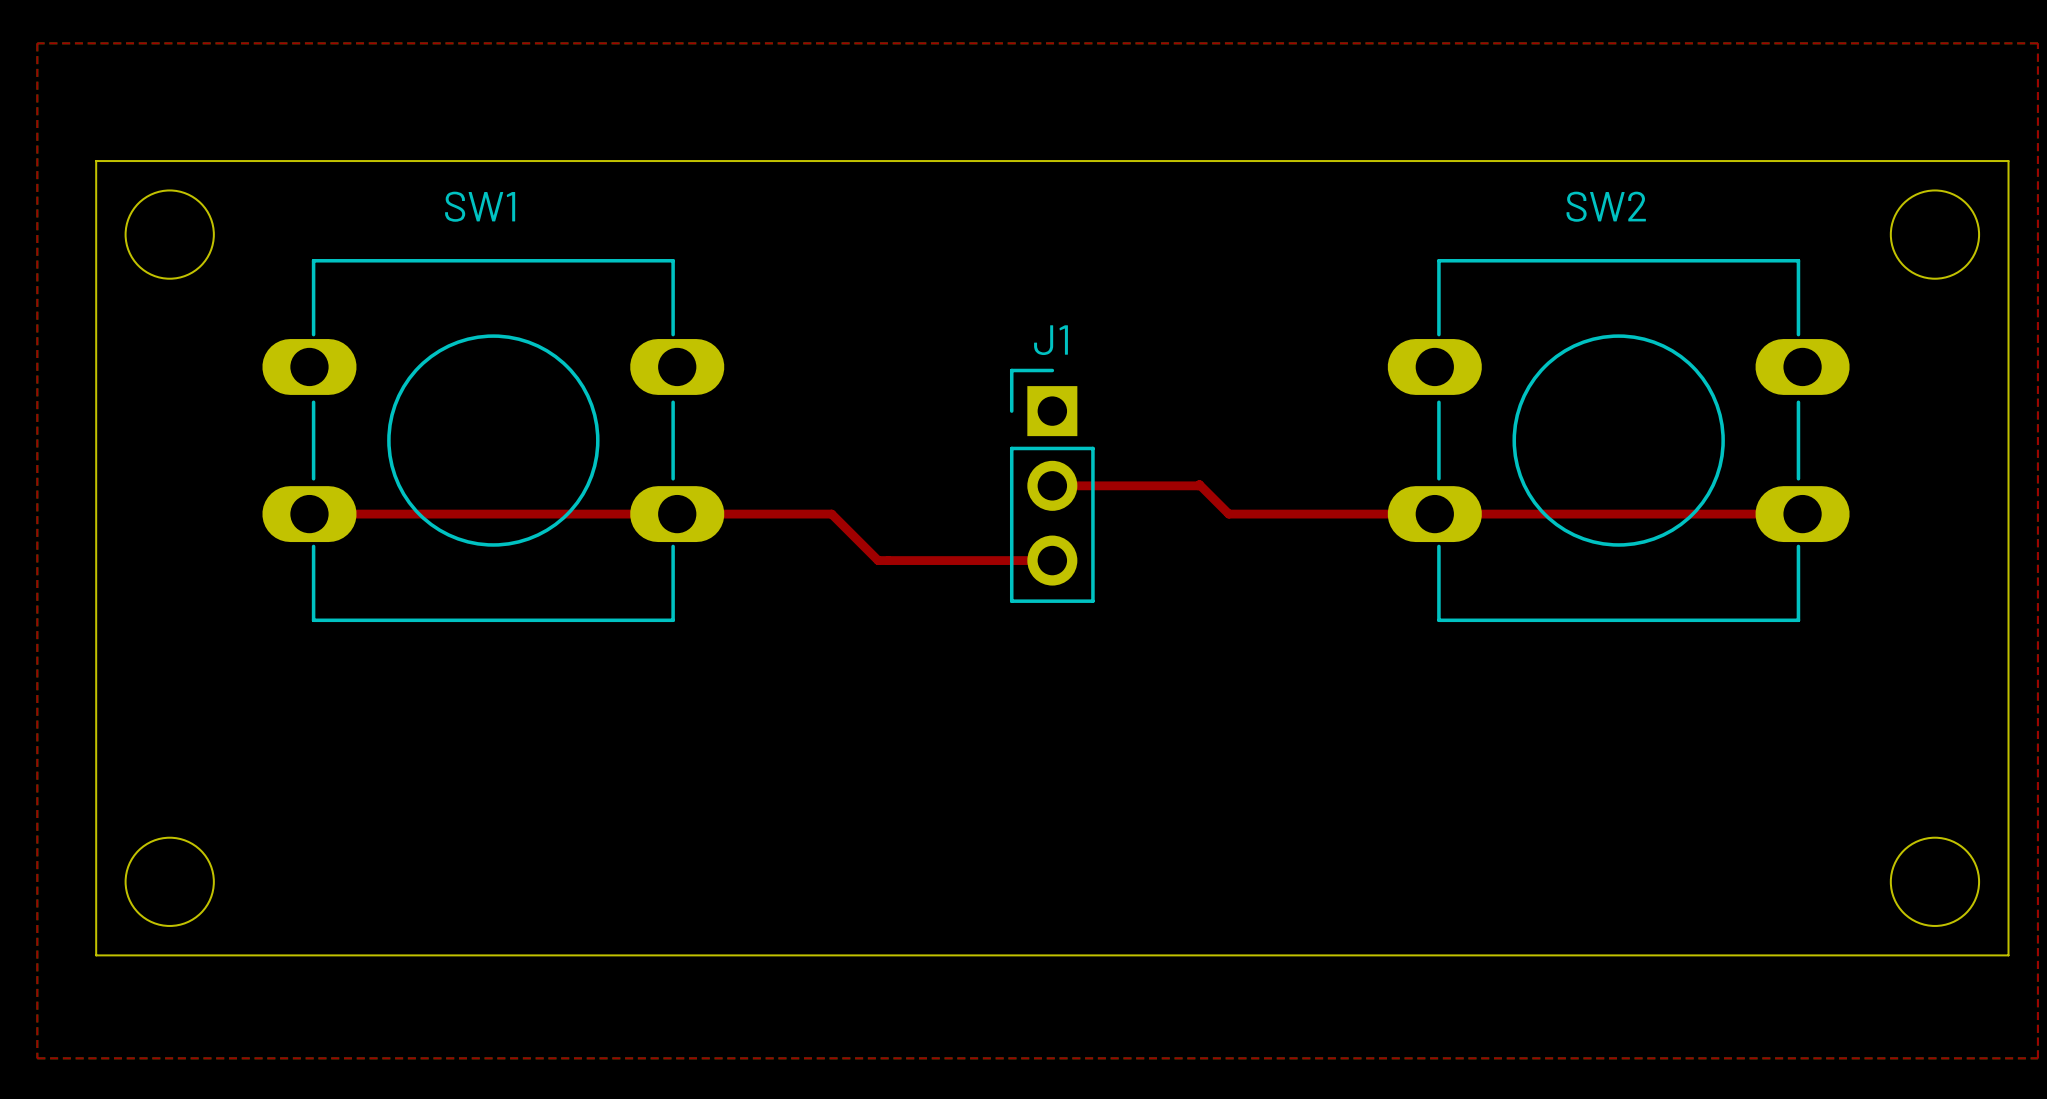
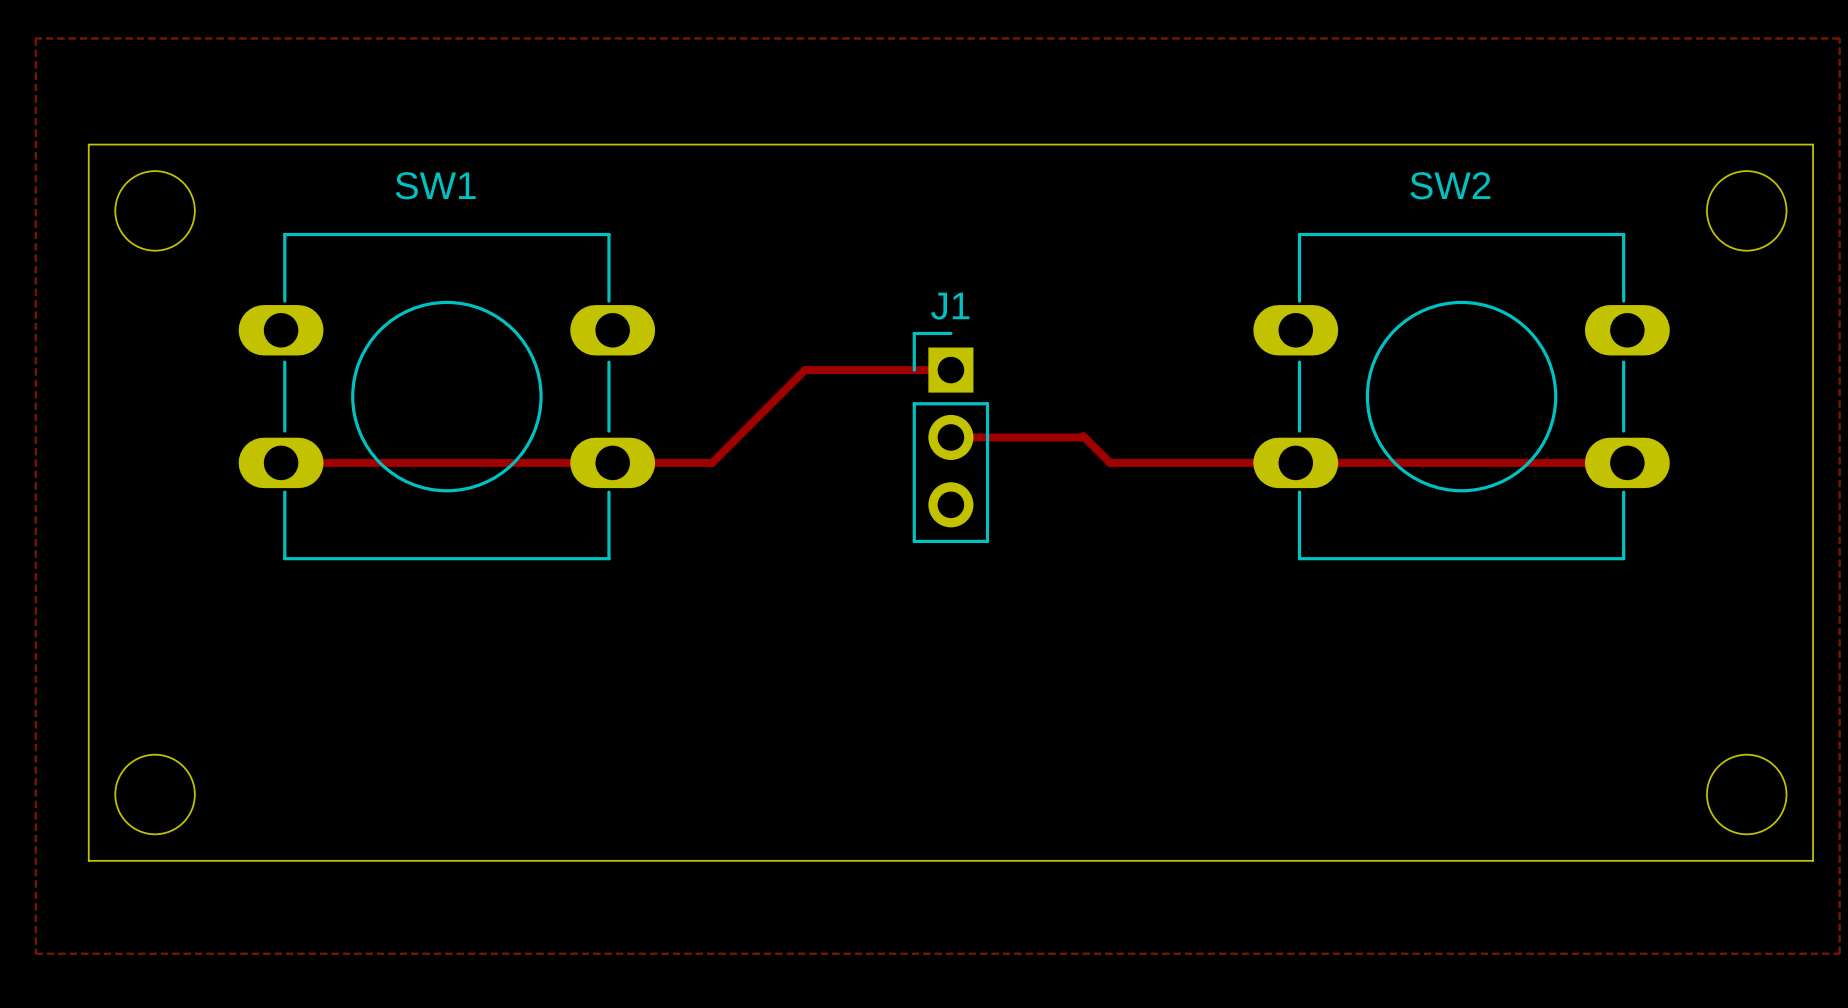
top track: (787, 514) (831, 514) (878, 560) (1052, 560) -> (712, 462) (805, 370) (950, 370)

